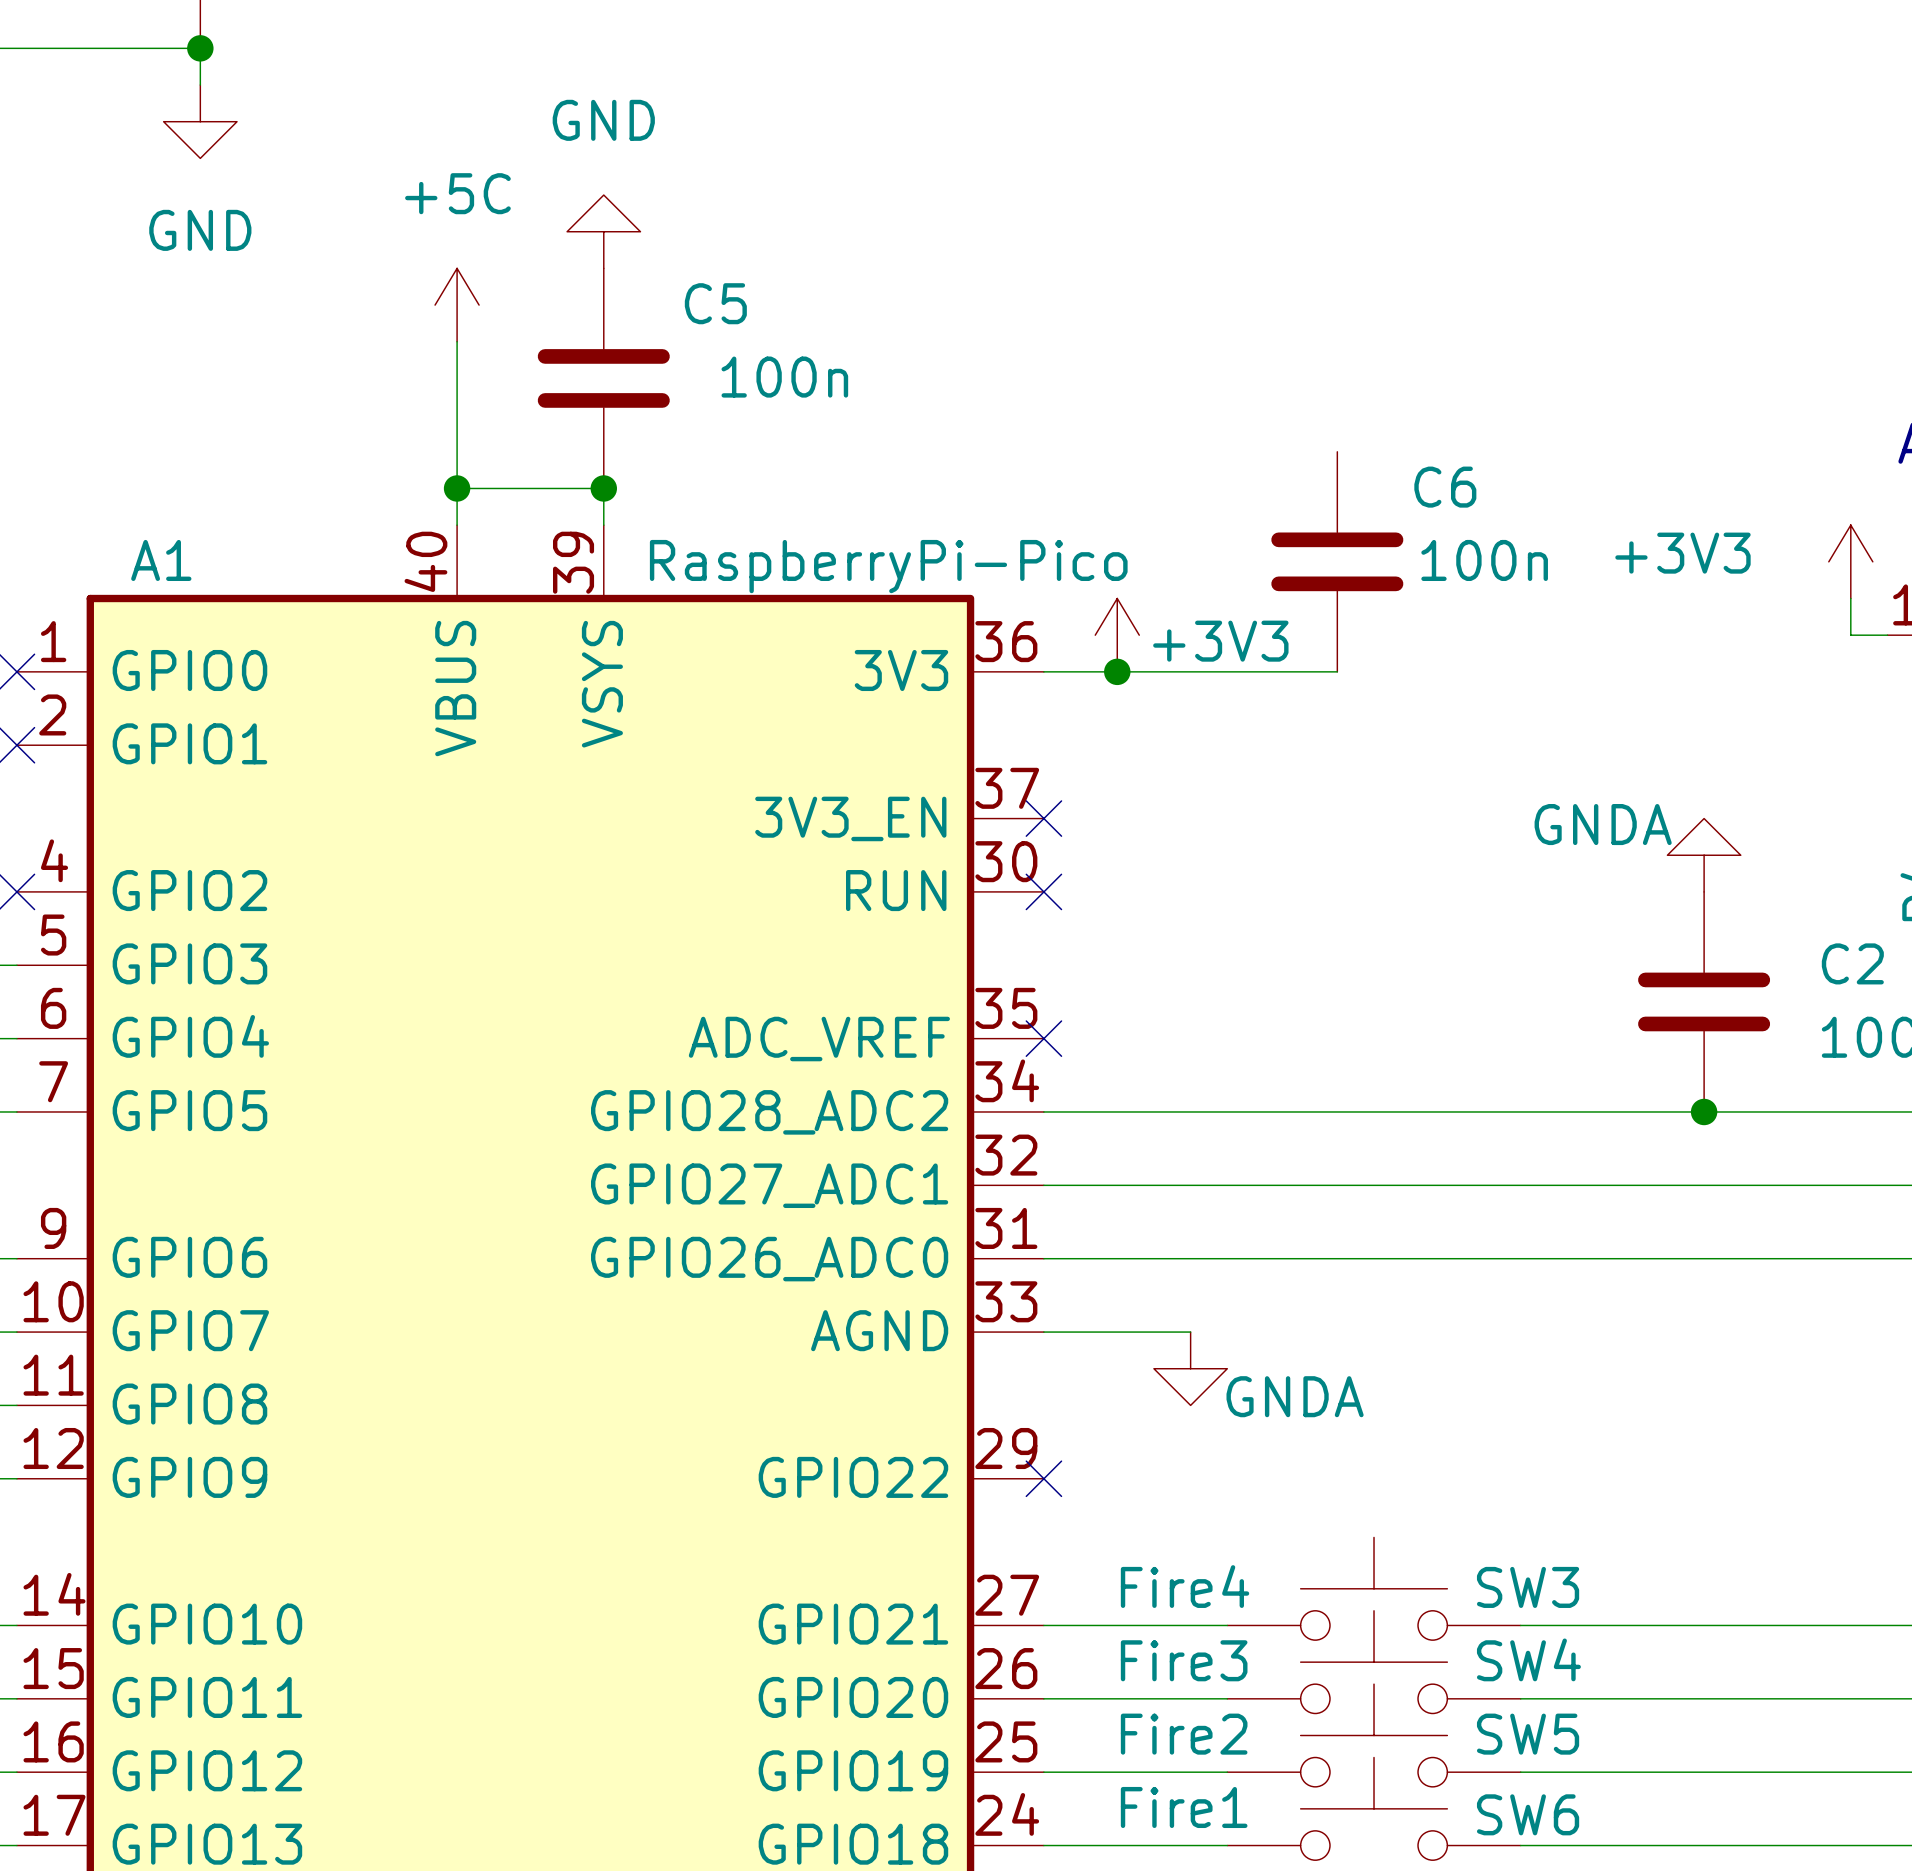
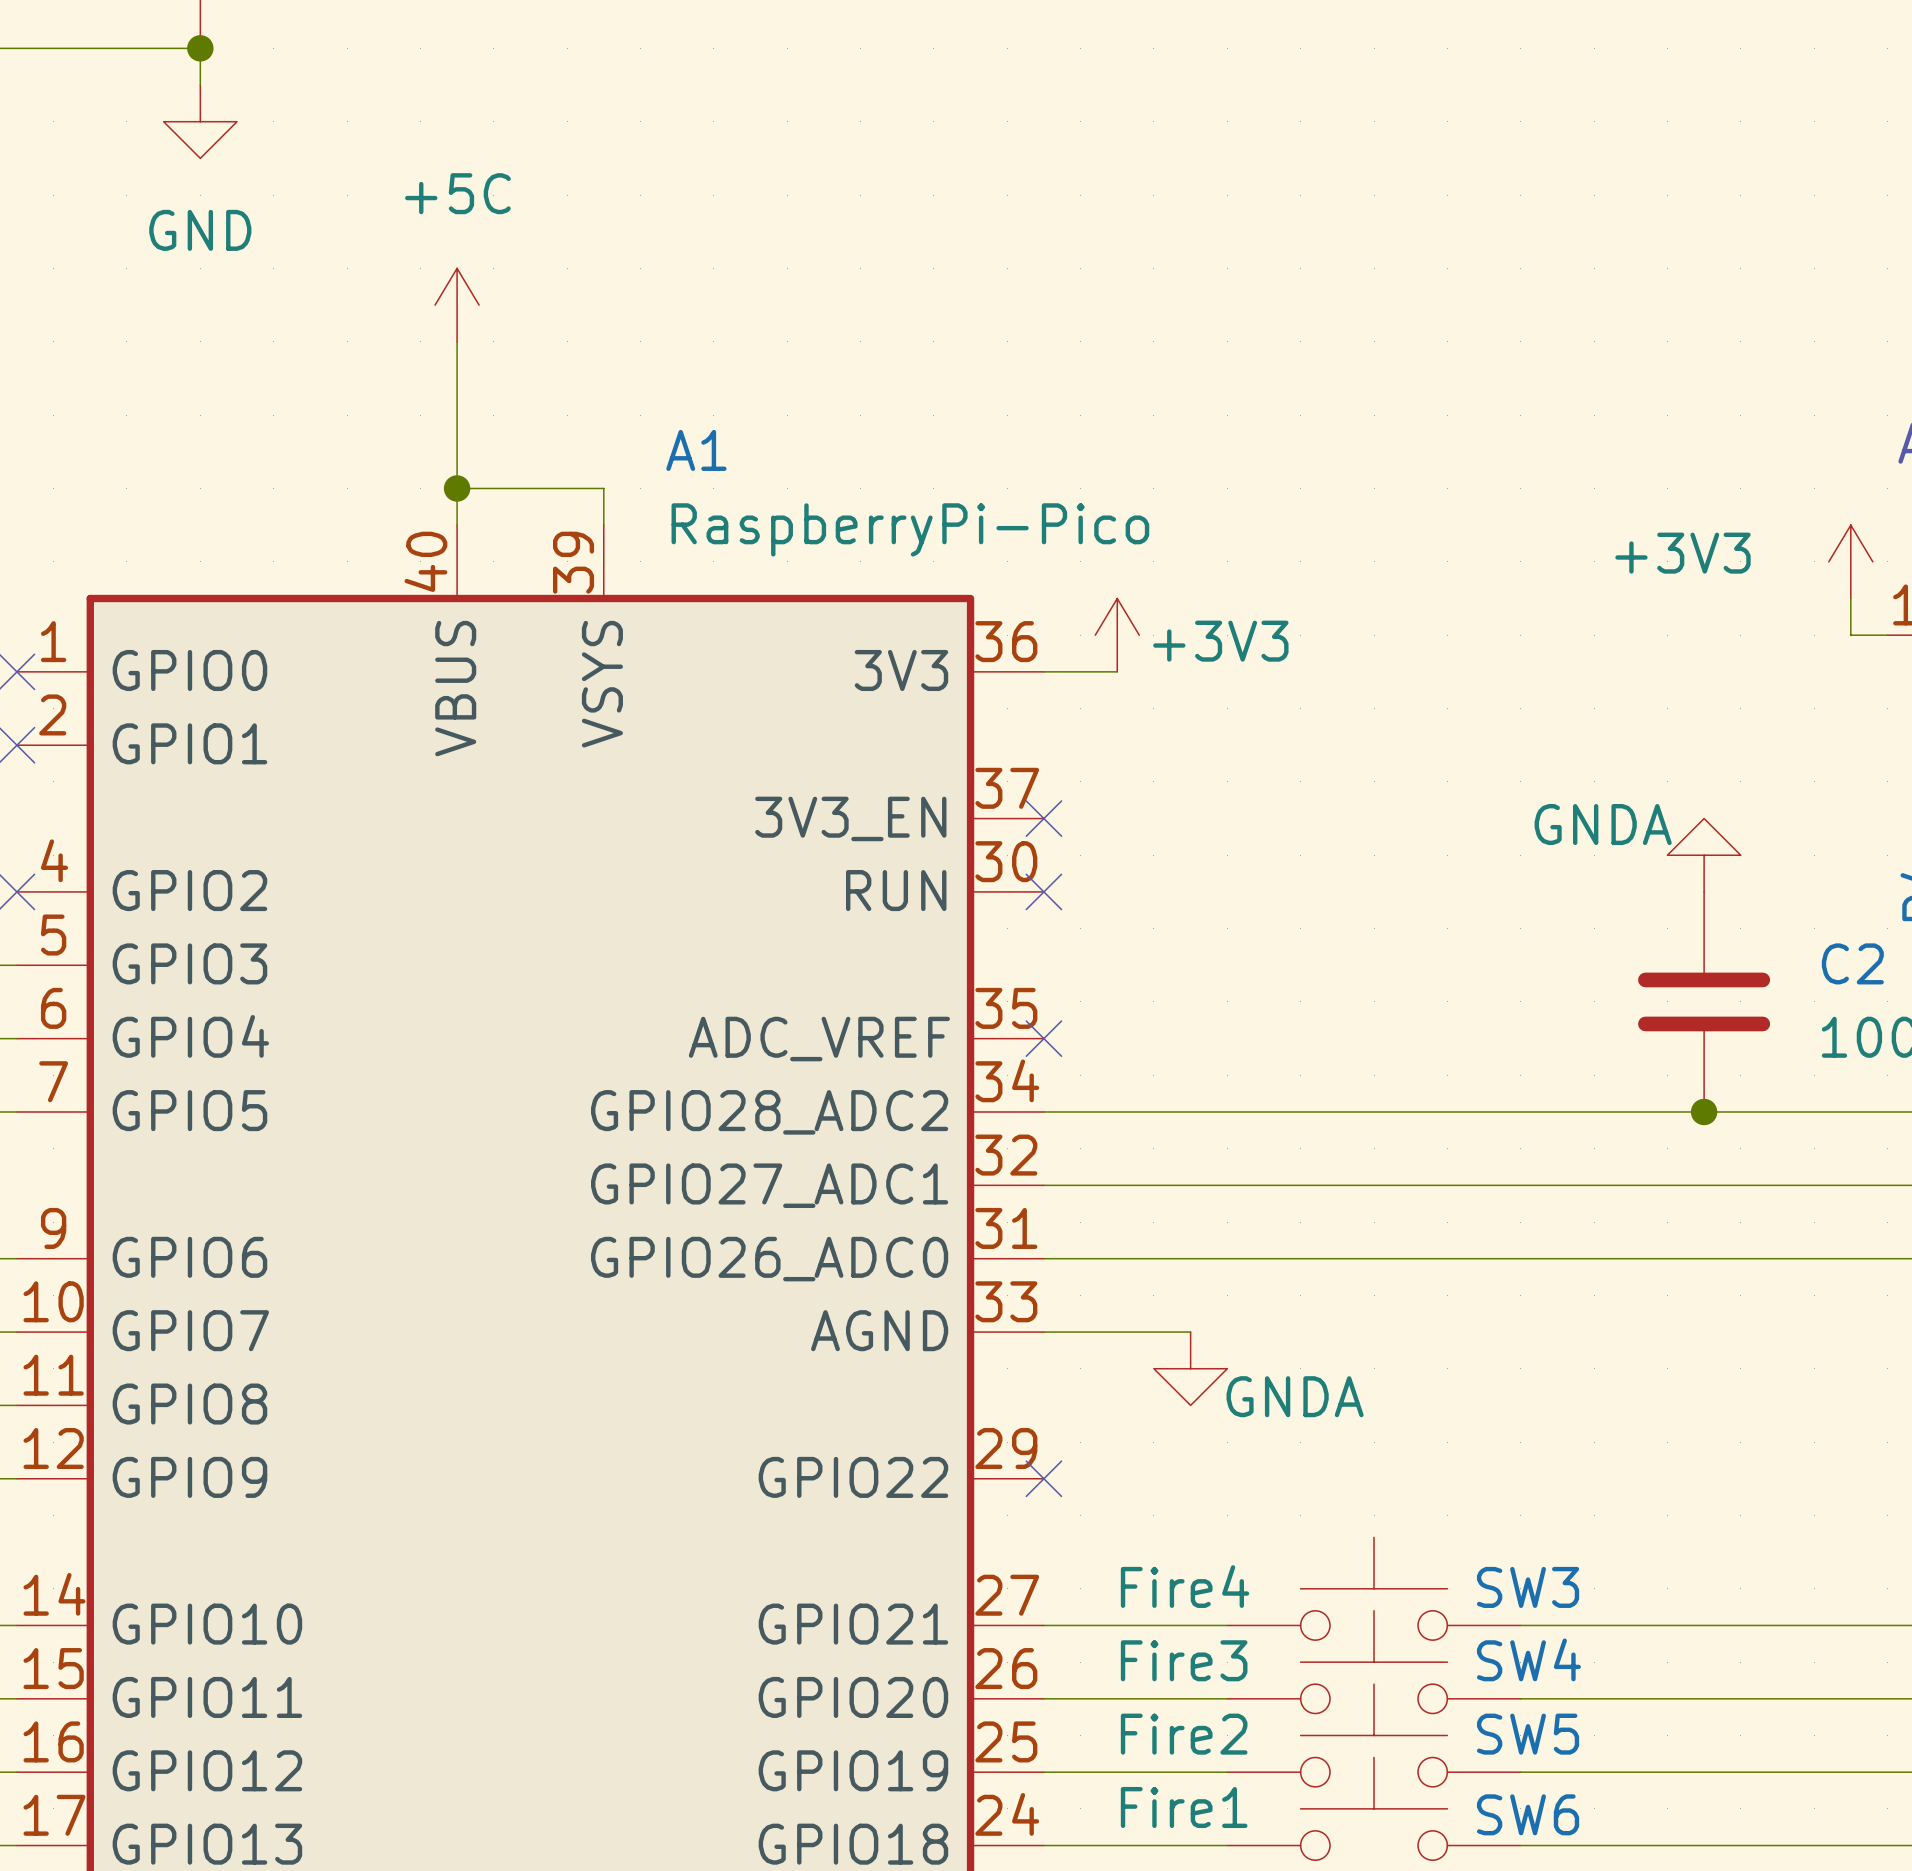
power symbol: GND (603, 231) -> none
C5: 100n (603, 378) -> none
junction: (603, 488) -> none
A1 name position: A1 (161, 560) -> A1 (696, 450)
C6: 100n (1337, 561) -> none
A1 value position: RaspberryPi-Pico (888, 566) -> RaspberryPi-Pico (910, 529)
wire: (1117, 671) (1337, 671) -> none
junction: (1117, 671) -> none

